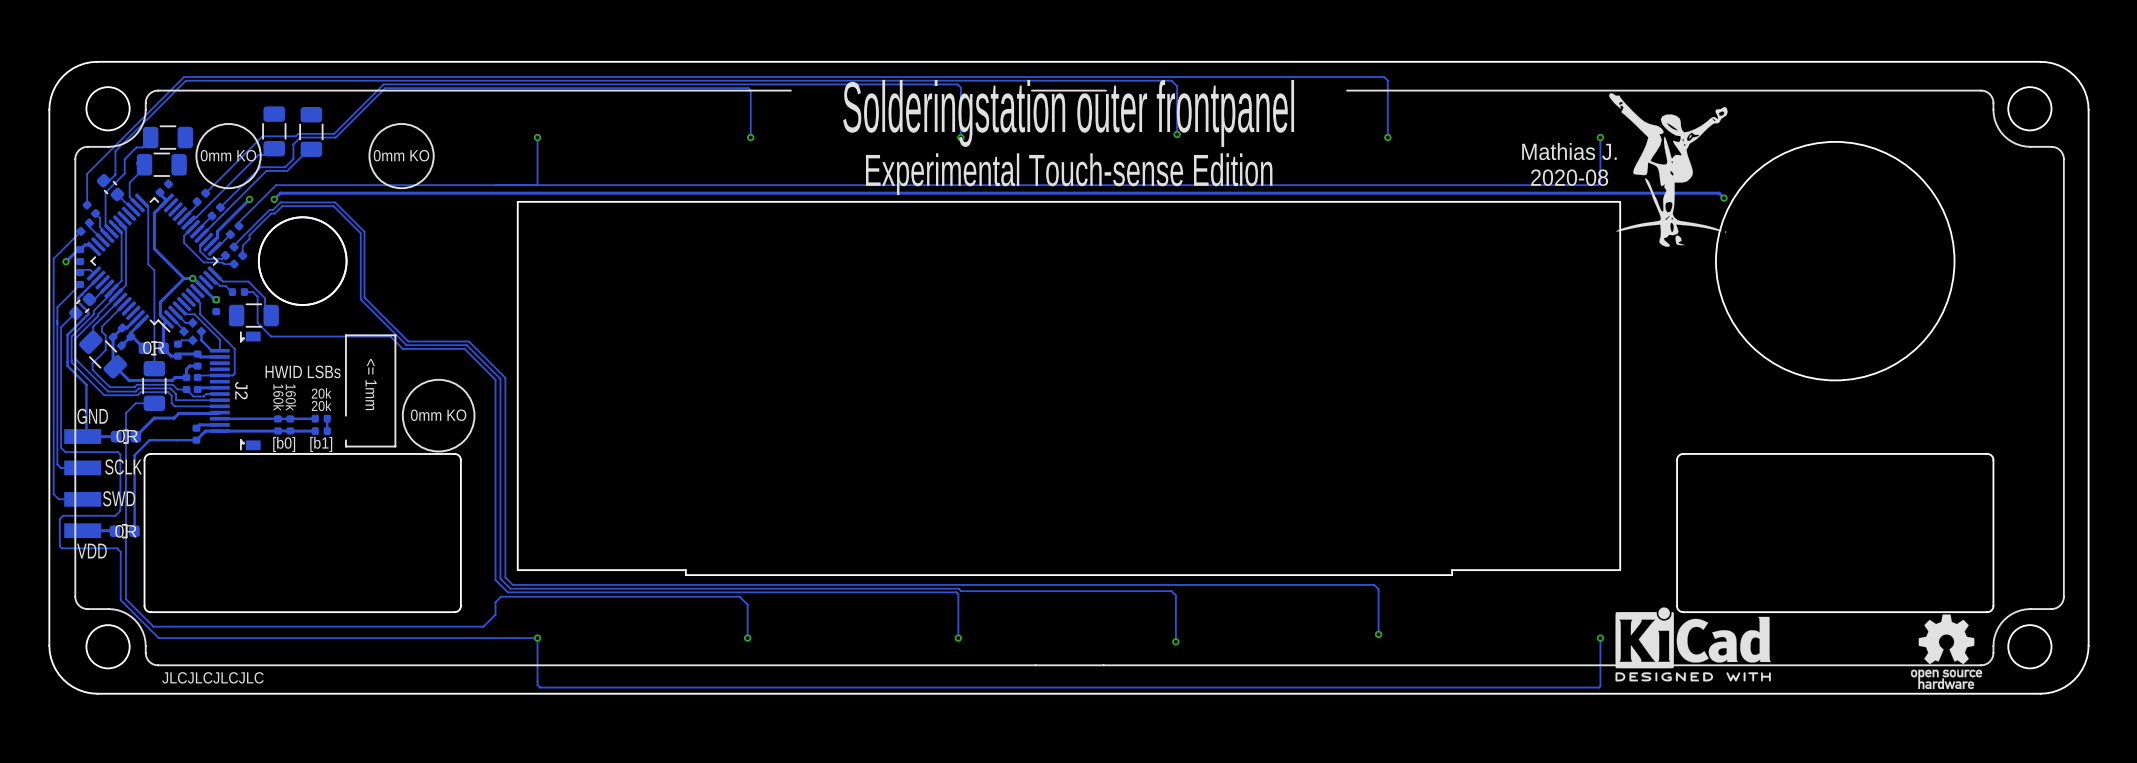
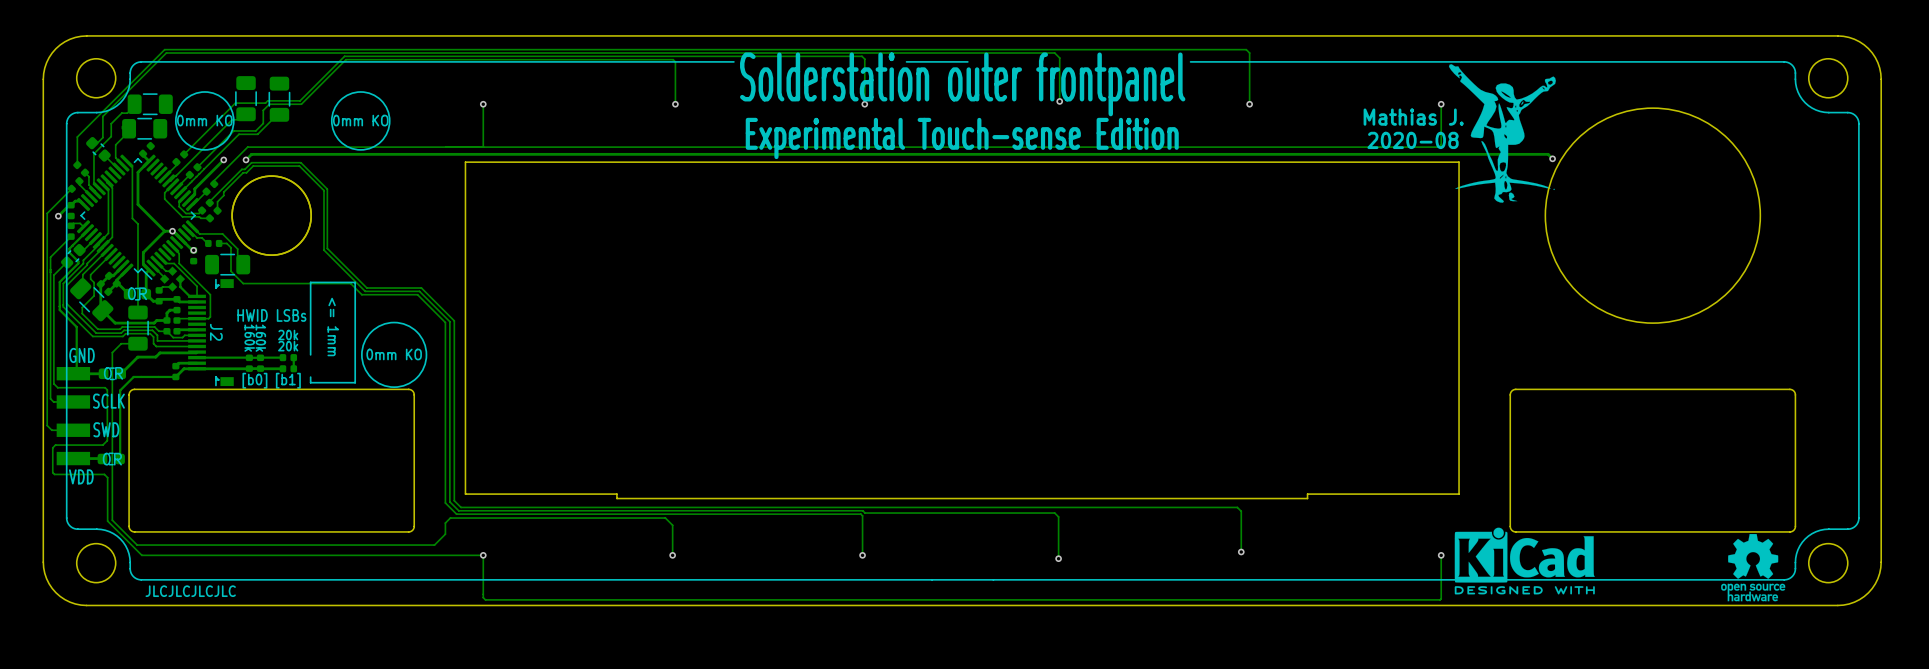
line: none -> (733, 61) (711, 61)
line: none -> (928, 61) (906, 61)
line: (1106, 90) (1075, 90) -> none
line: none -> (1212, 61) (1190, 61)
text: Solderingstation outer frontpanel (1068, 113) -> Solderstation outer frontpanel (962, 84)

